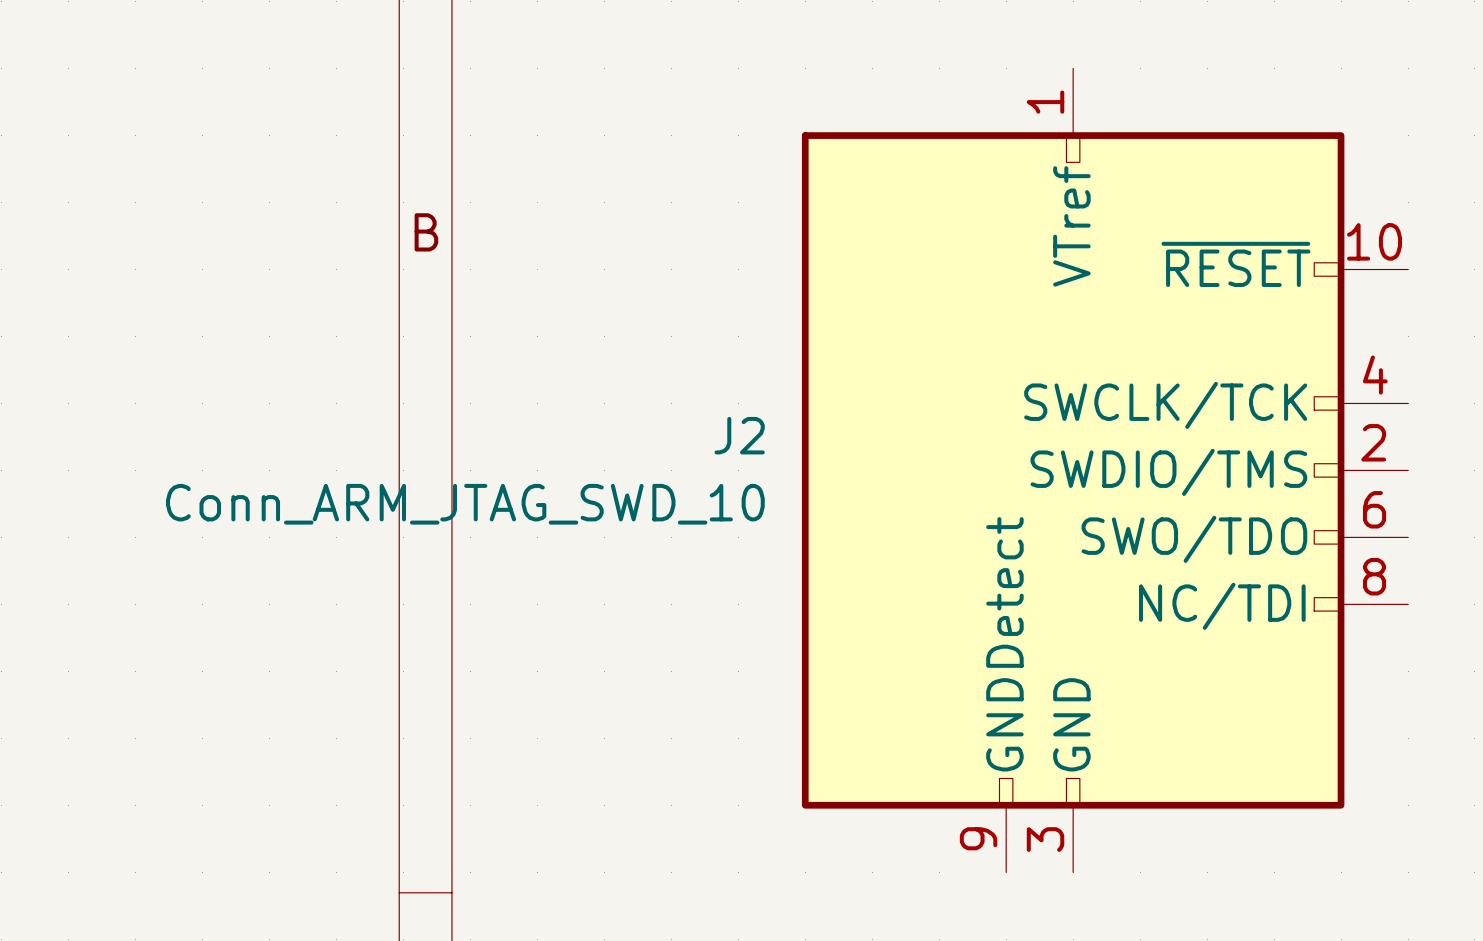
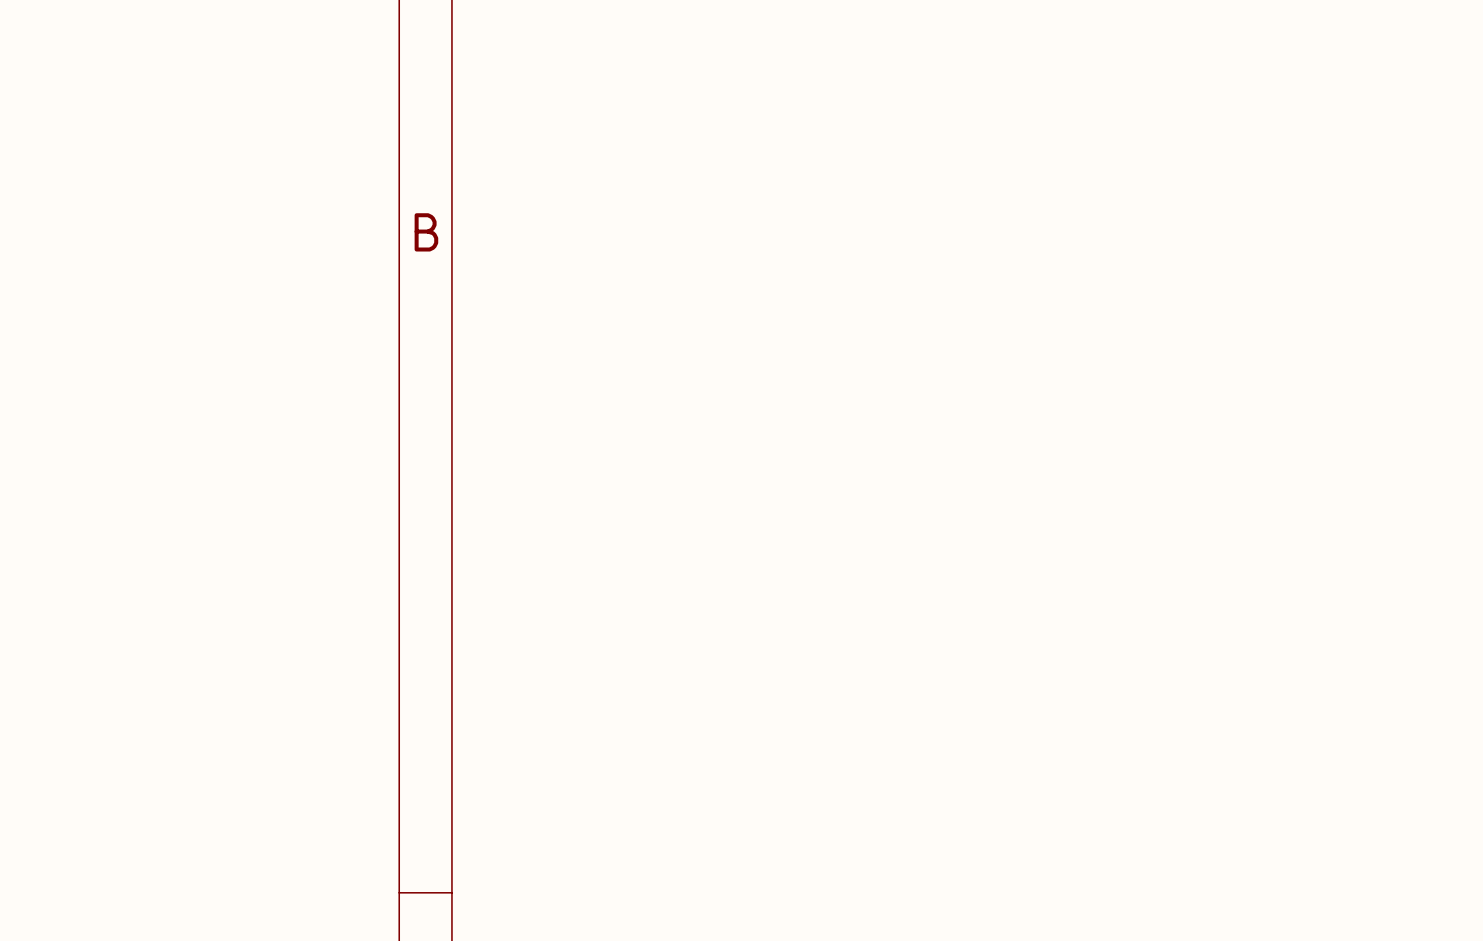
J2: Conn_ARM_JTAG_SWD_10 (1104, 470) -> none

